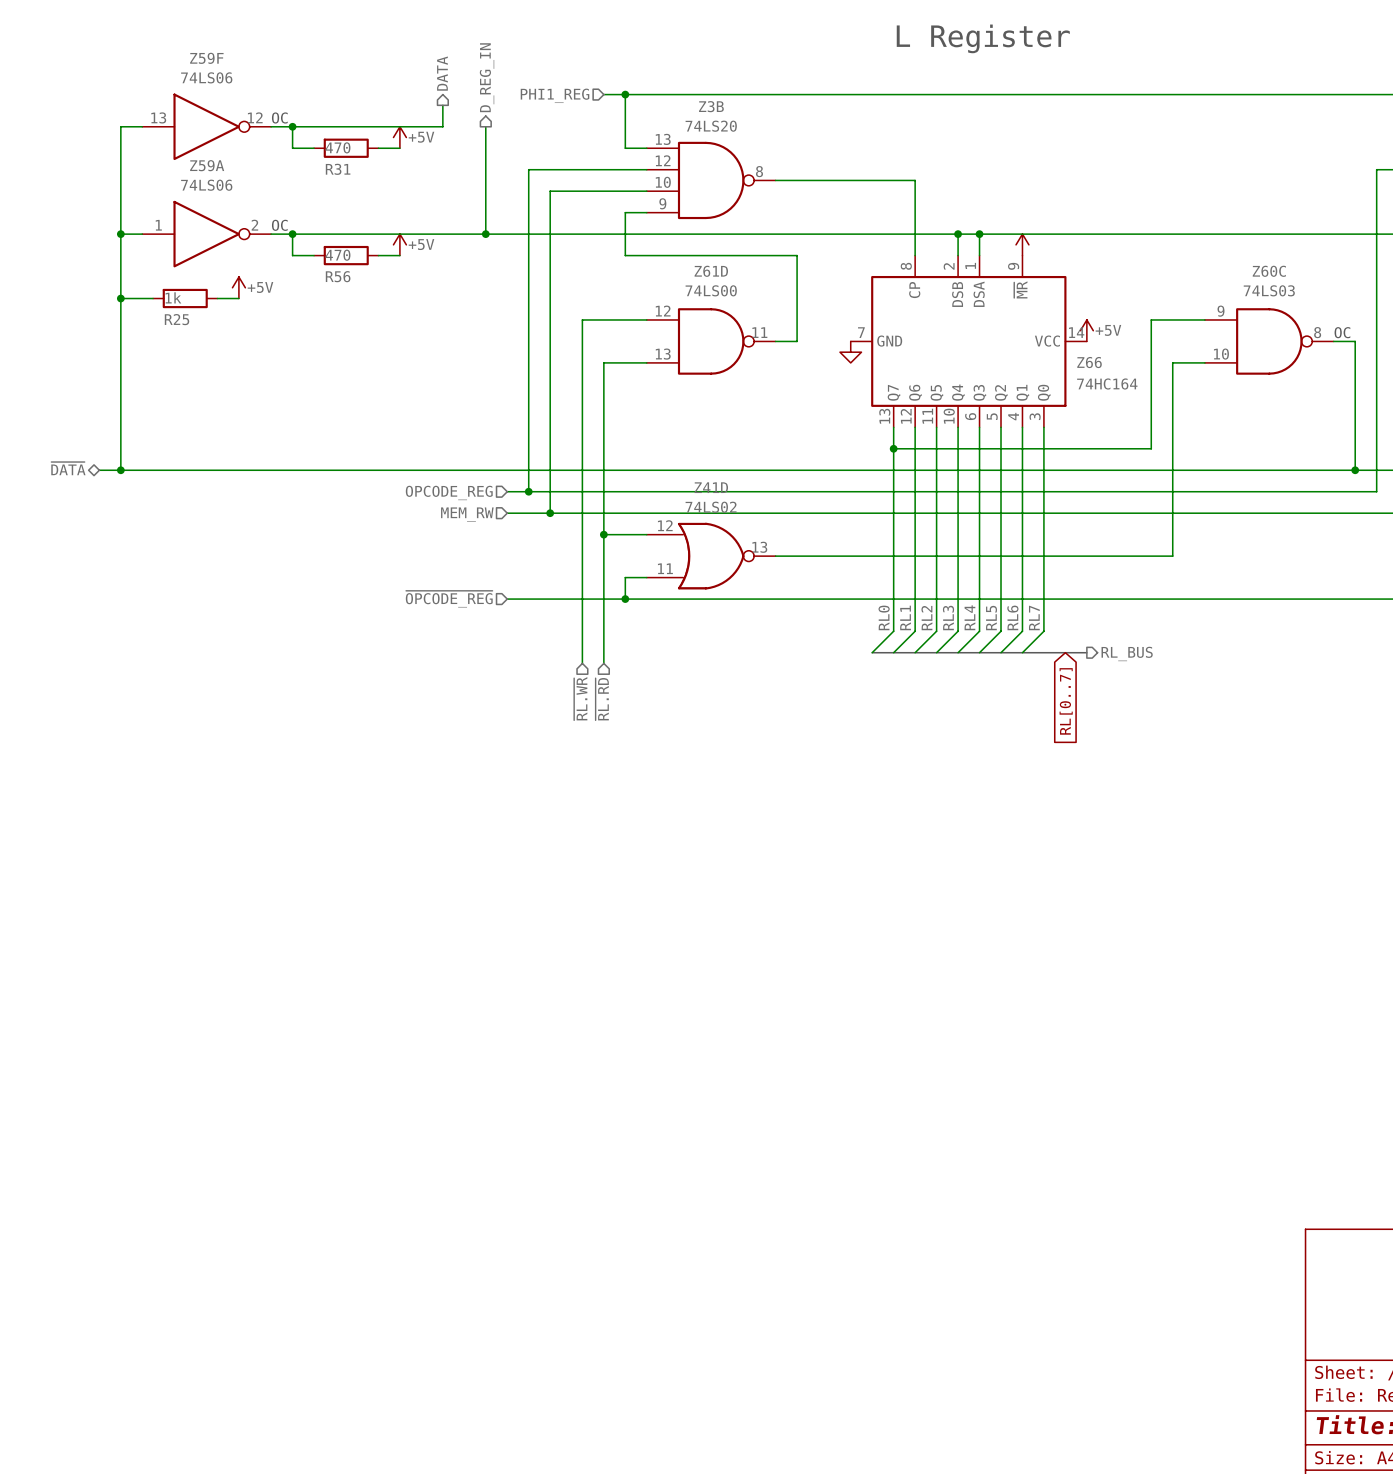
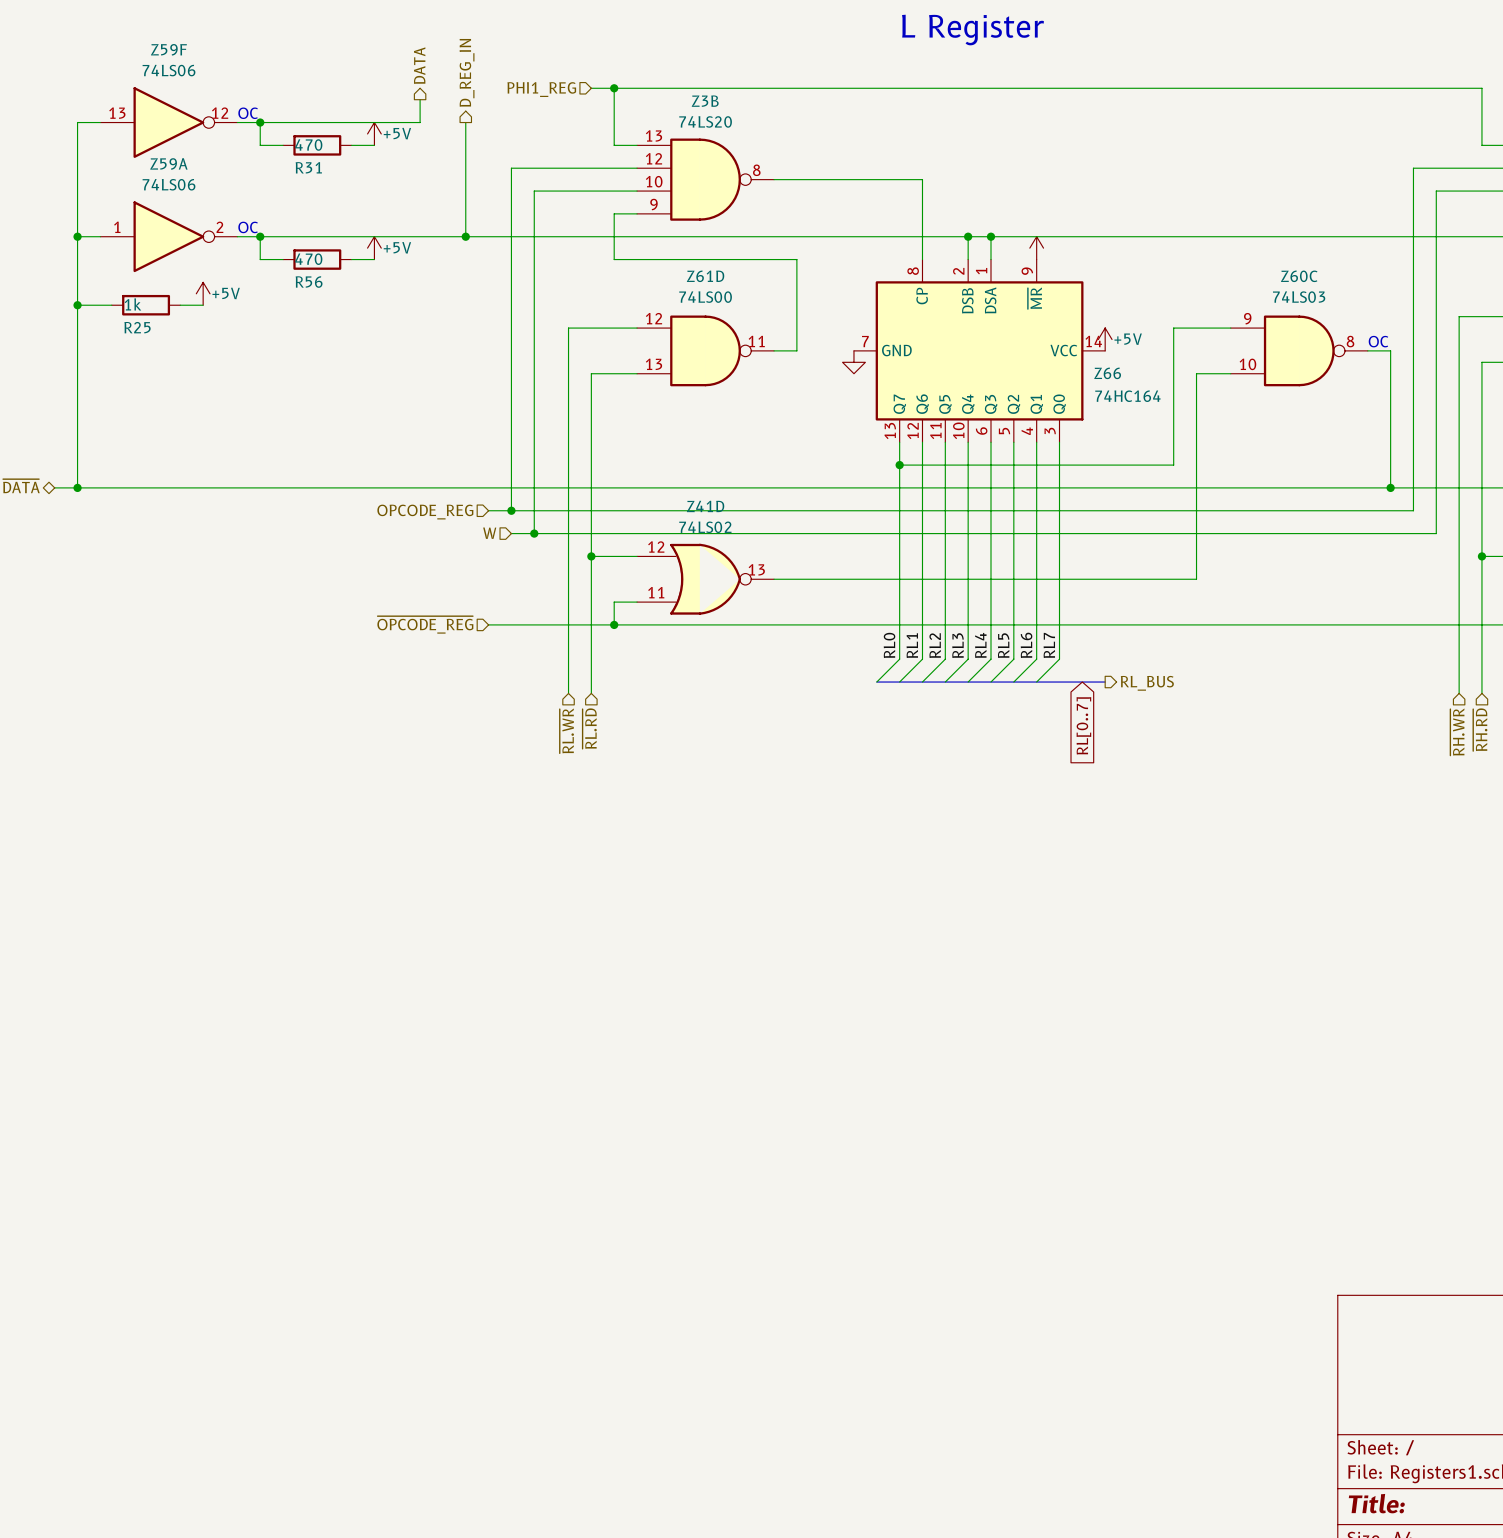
hierarchical label: none -> W (489, 533)
wire: (507, 513) (528, 513) -> none
hierarchical label: MEM_RW (467, 514) -> none

